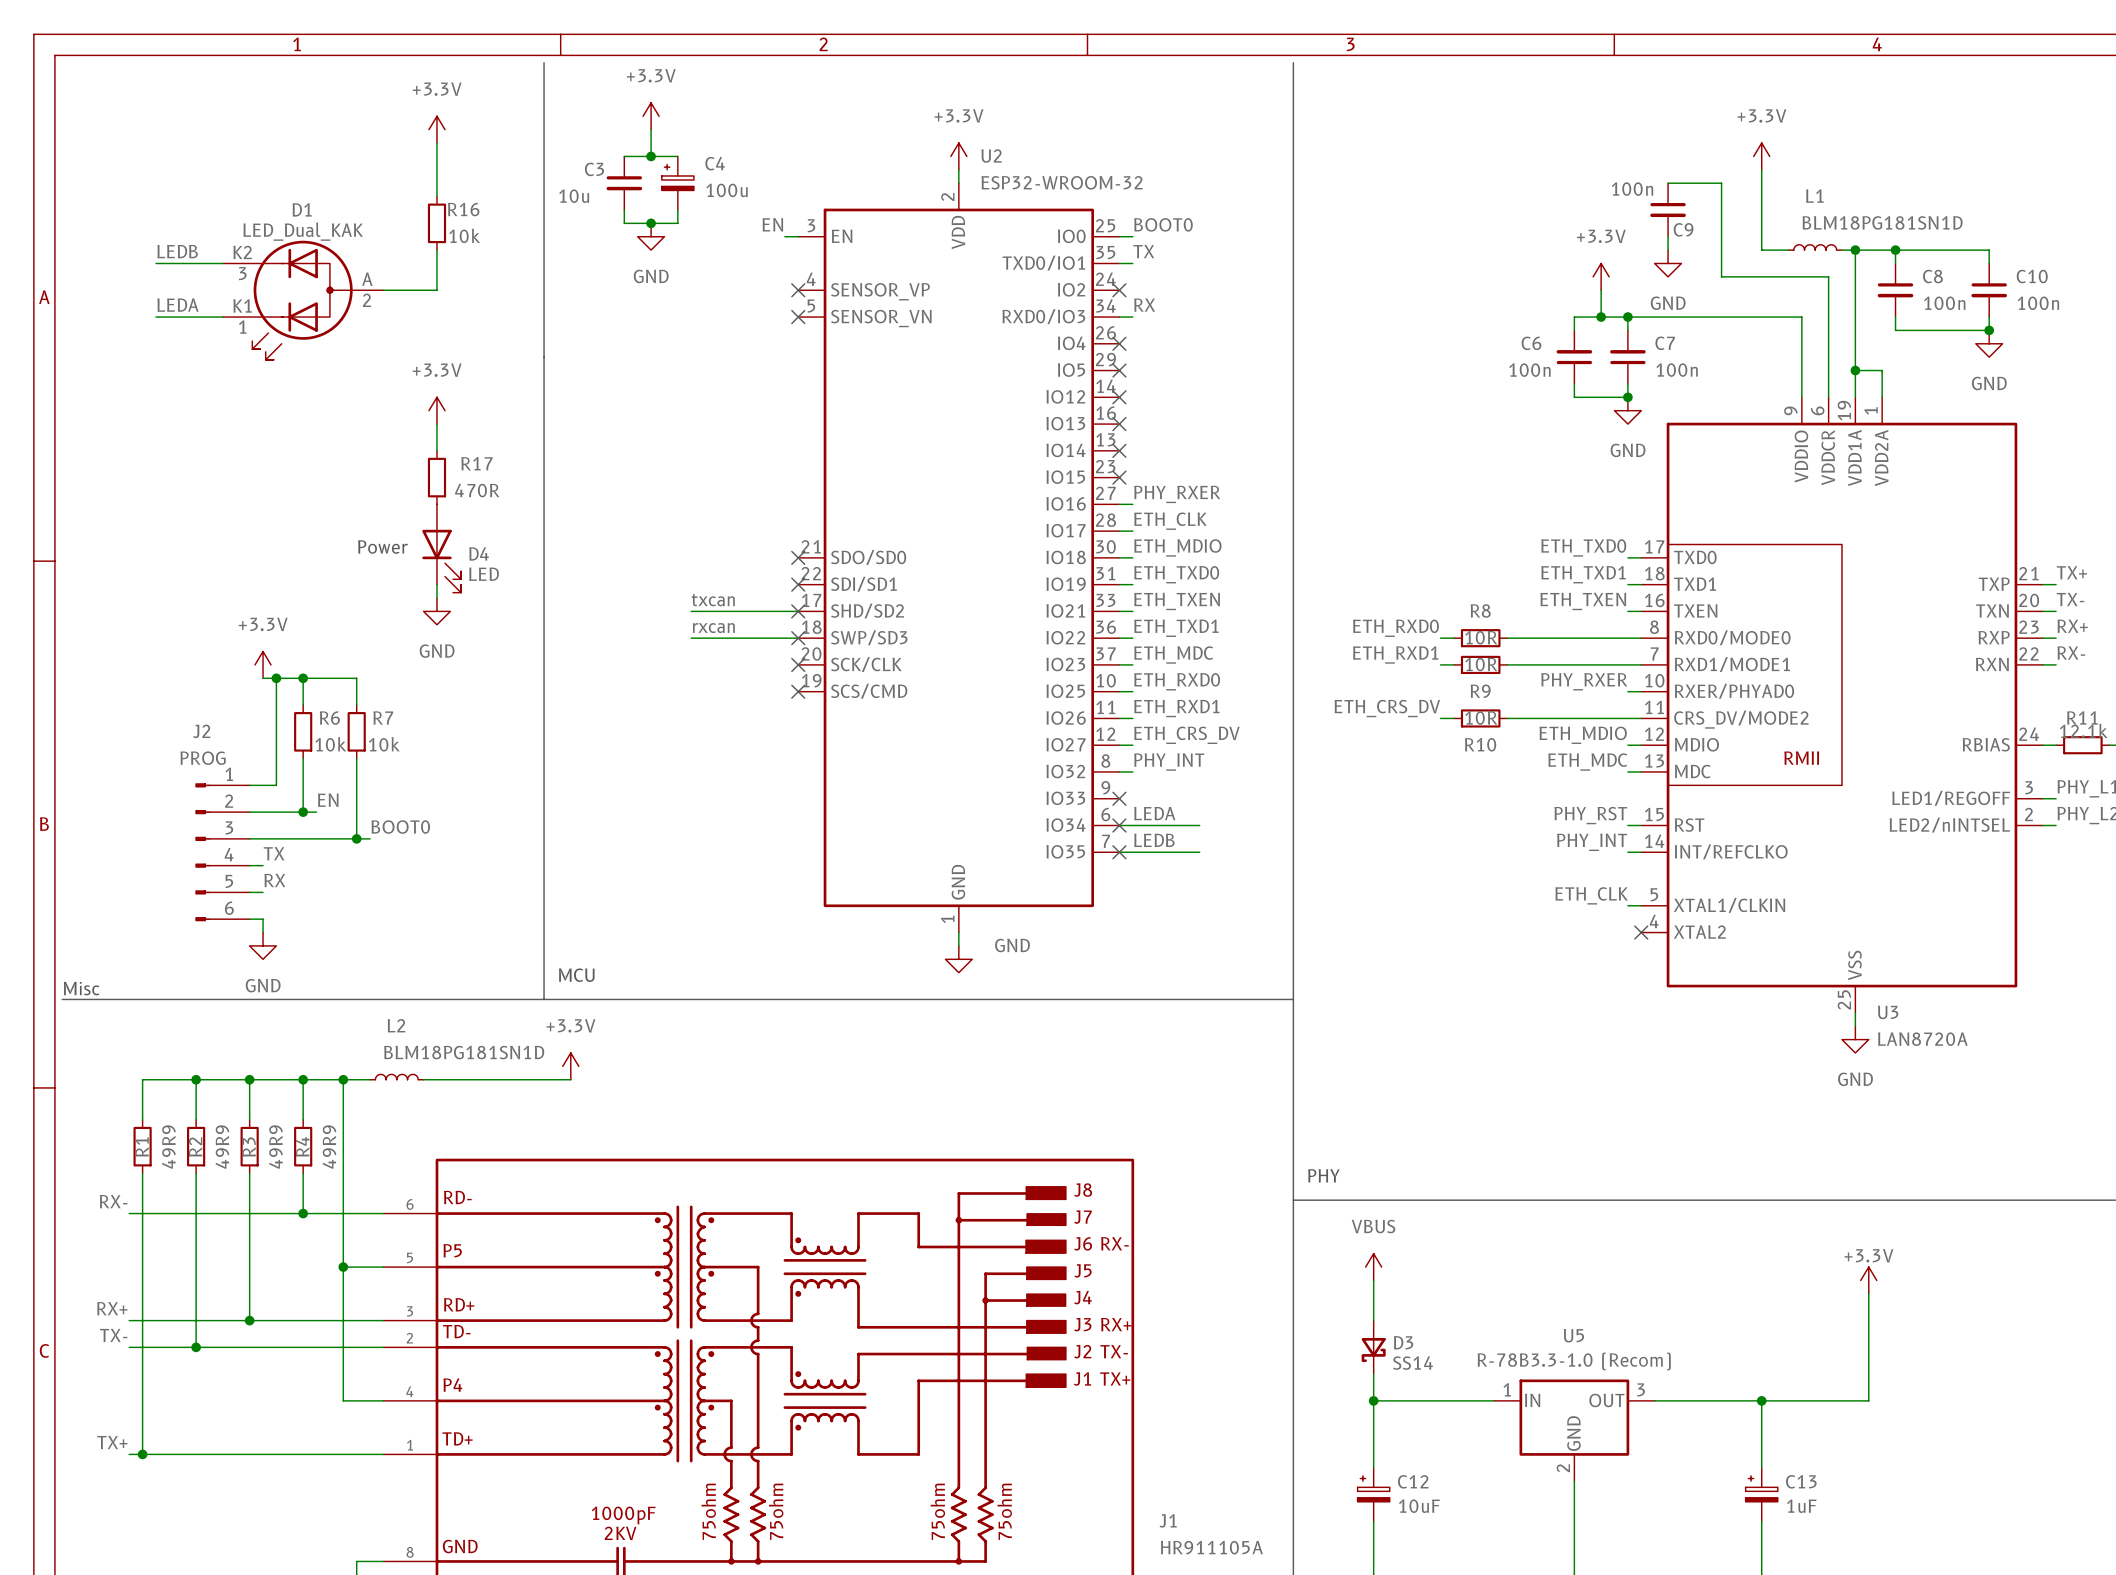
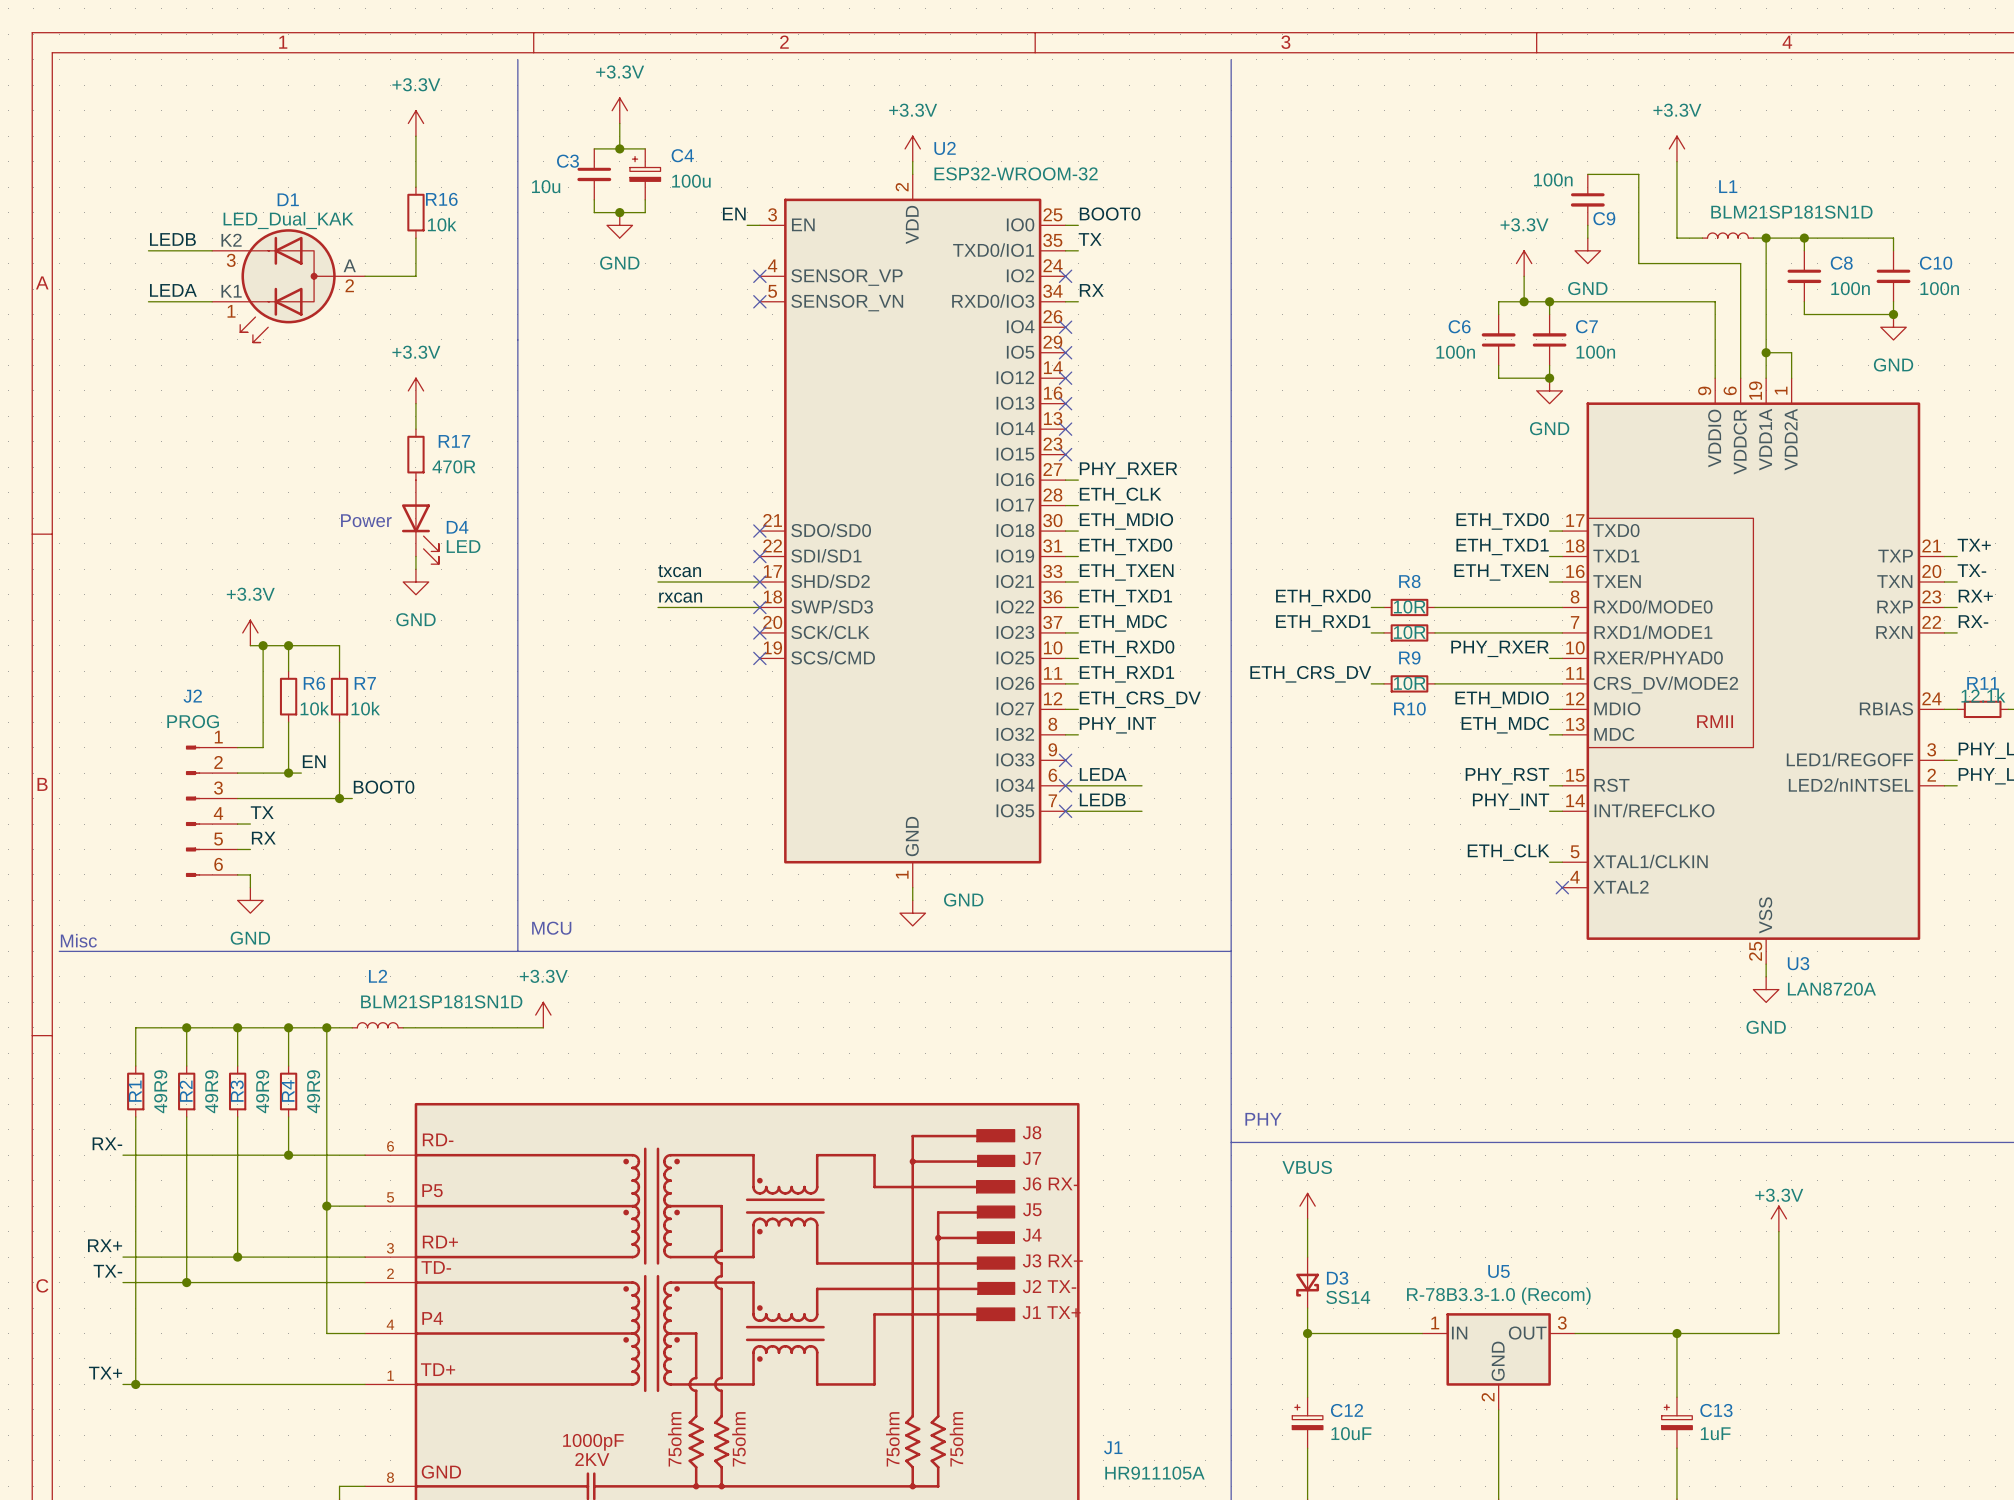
L1 value: BLM18PG181SN1D (1882, 222) -> BLM21SP181SN1D (1791, 212)
L2 value: BLM18PG181SN1D (464, 1052) -> BLM21SP181SN1D (441, 1001)

